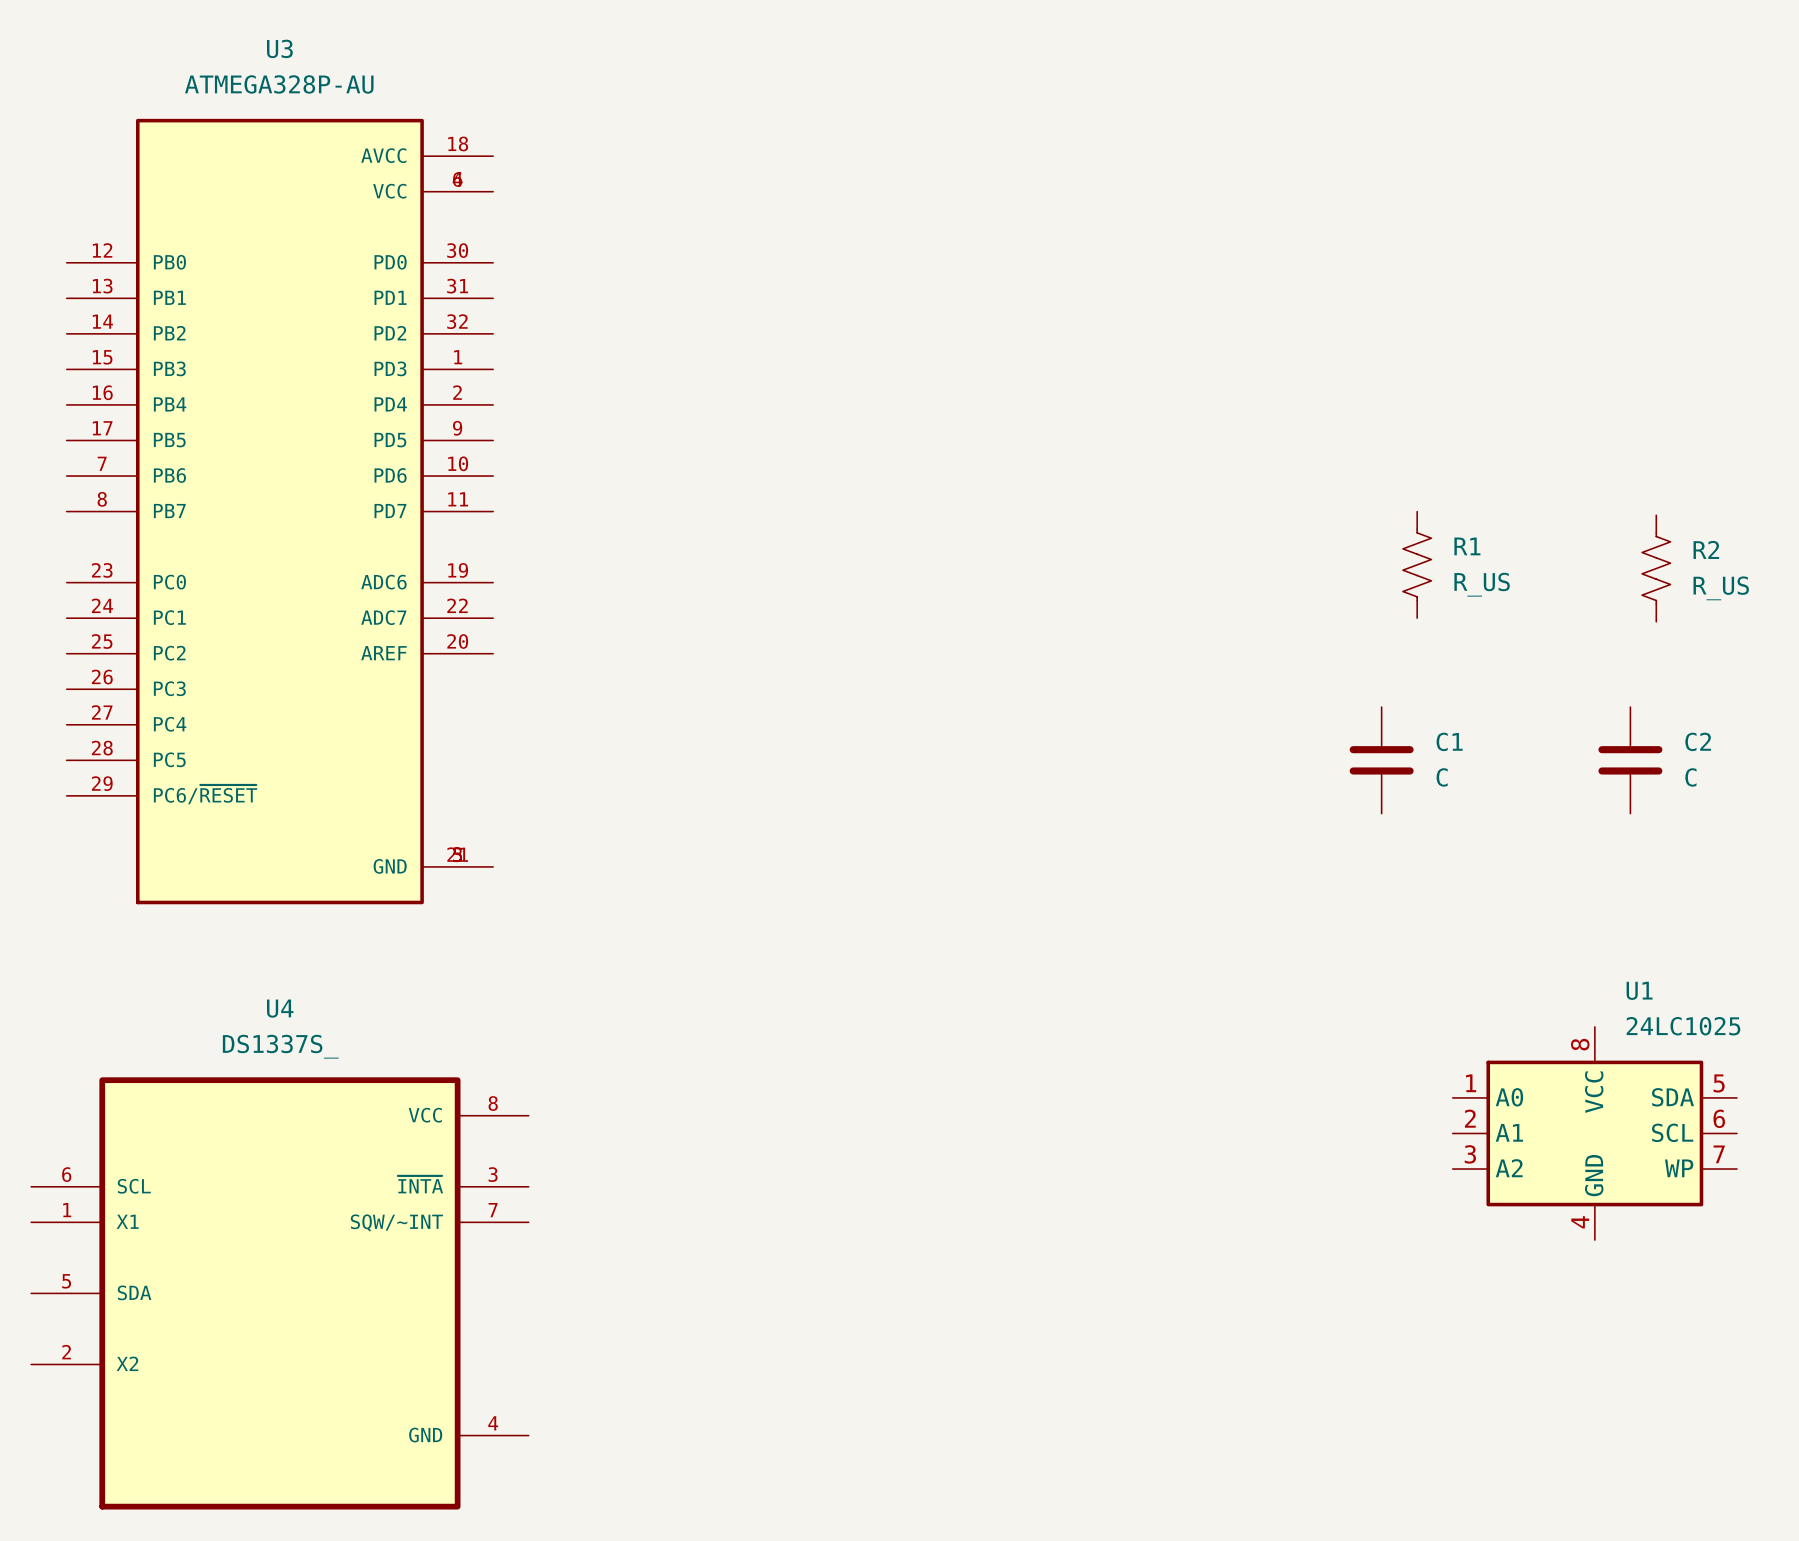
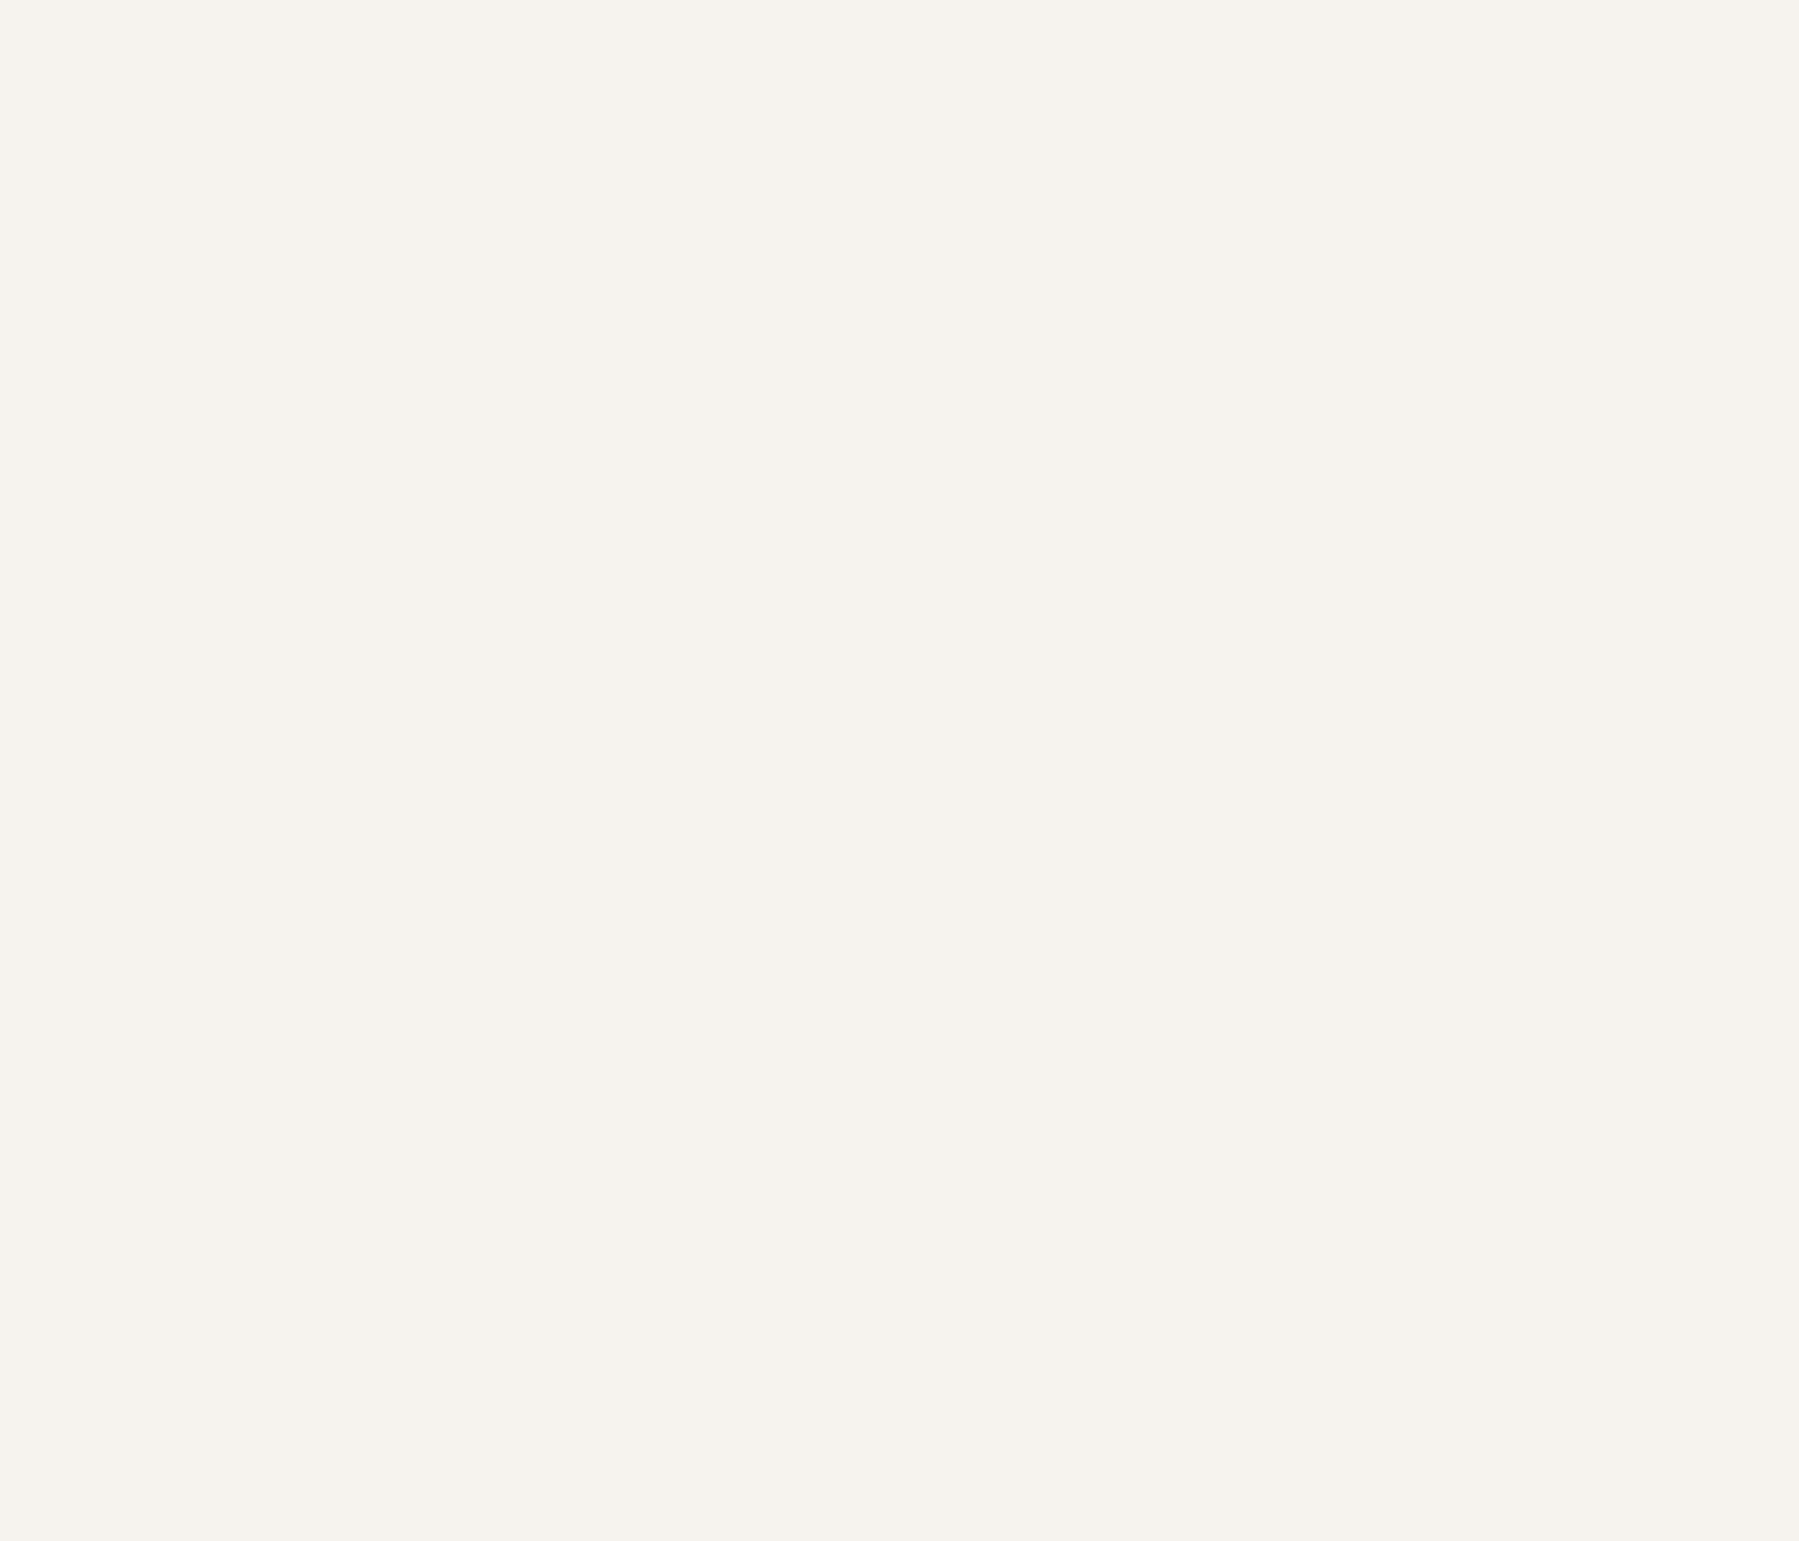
U3: ATMEGA328P-AU (279, 511) -> none
R1: R_US (1417, 564) -> none
R2: R_US (1656, 568) -> none
C1: C (1381, 760) -> none
C2: C (1630, 760) -> none
U1: 24LC1025 (1594, 1133) -> none
U4: DS1337S_ (279, 1293) -> none

